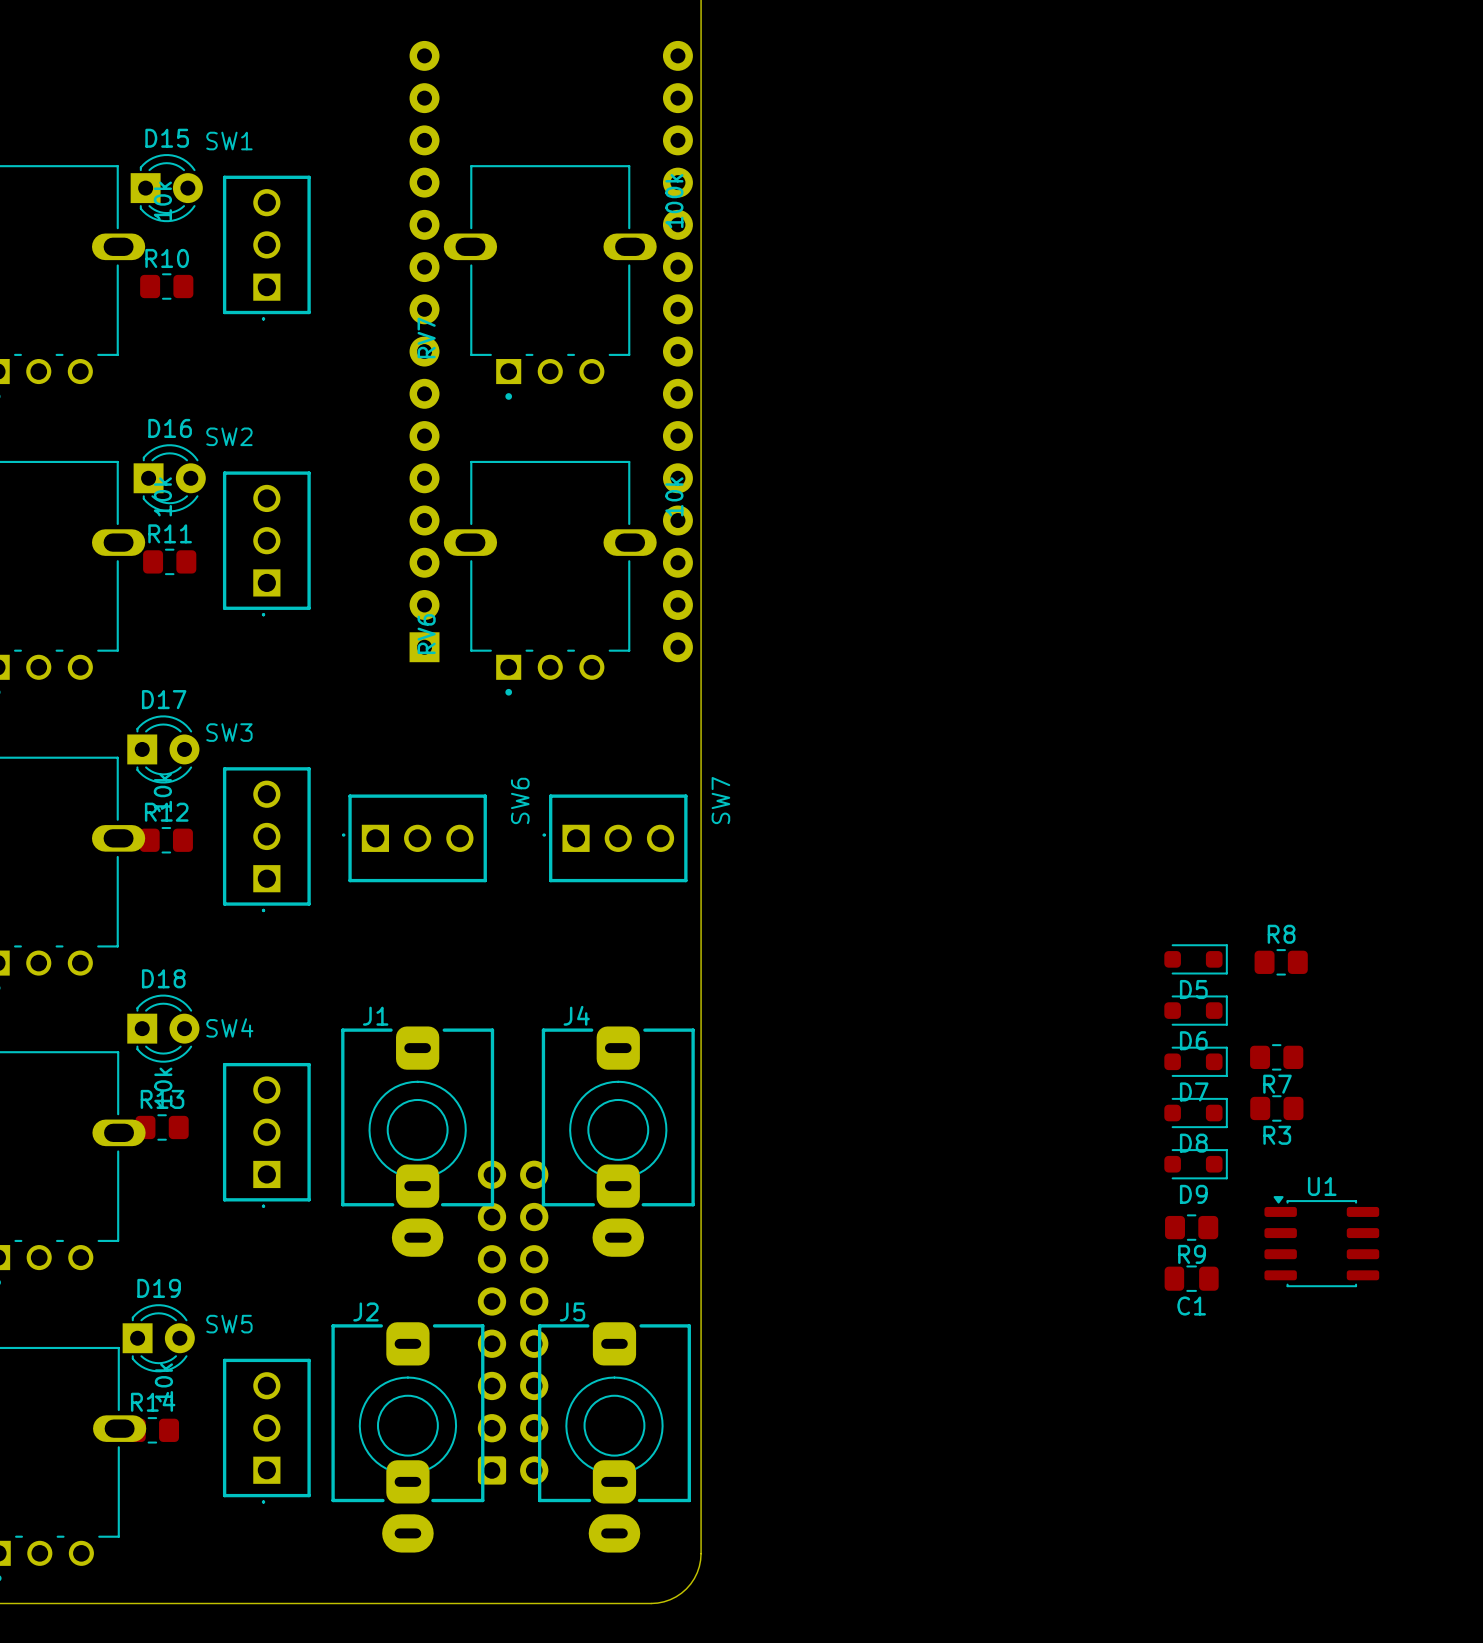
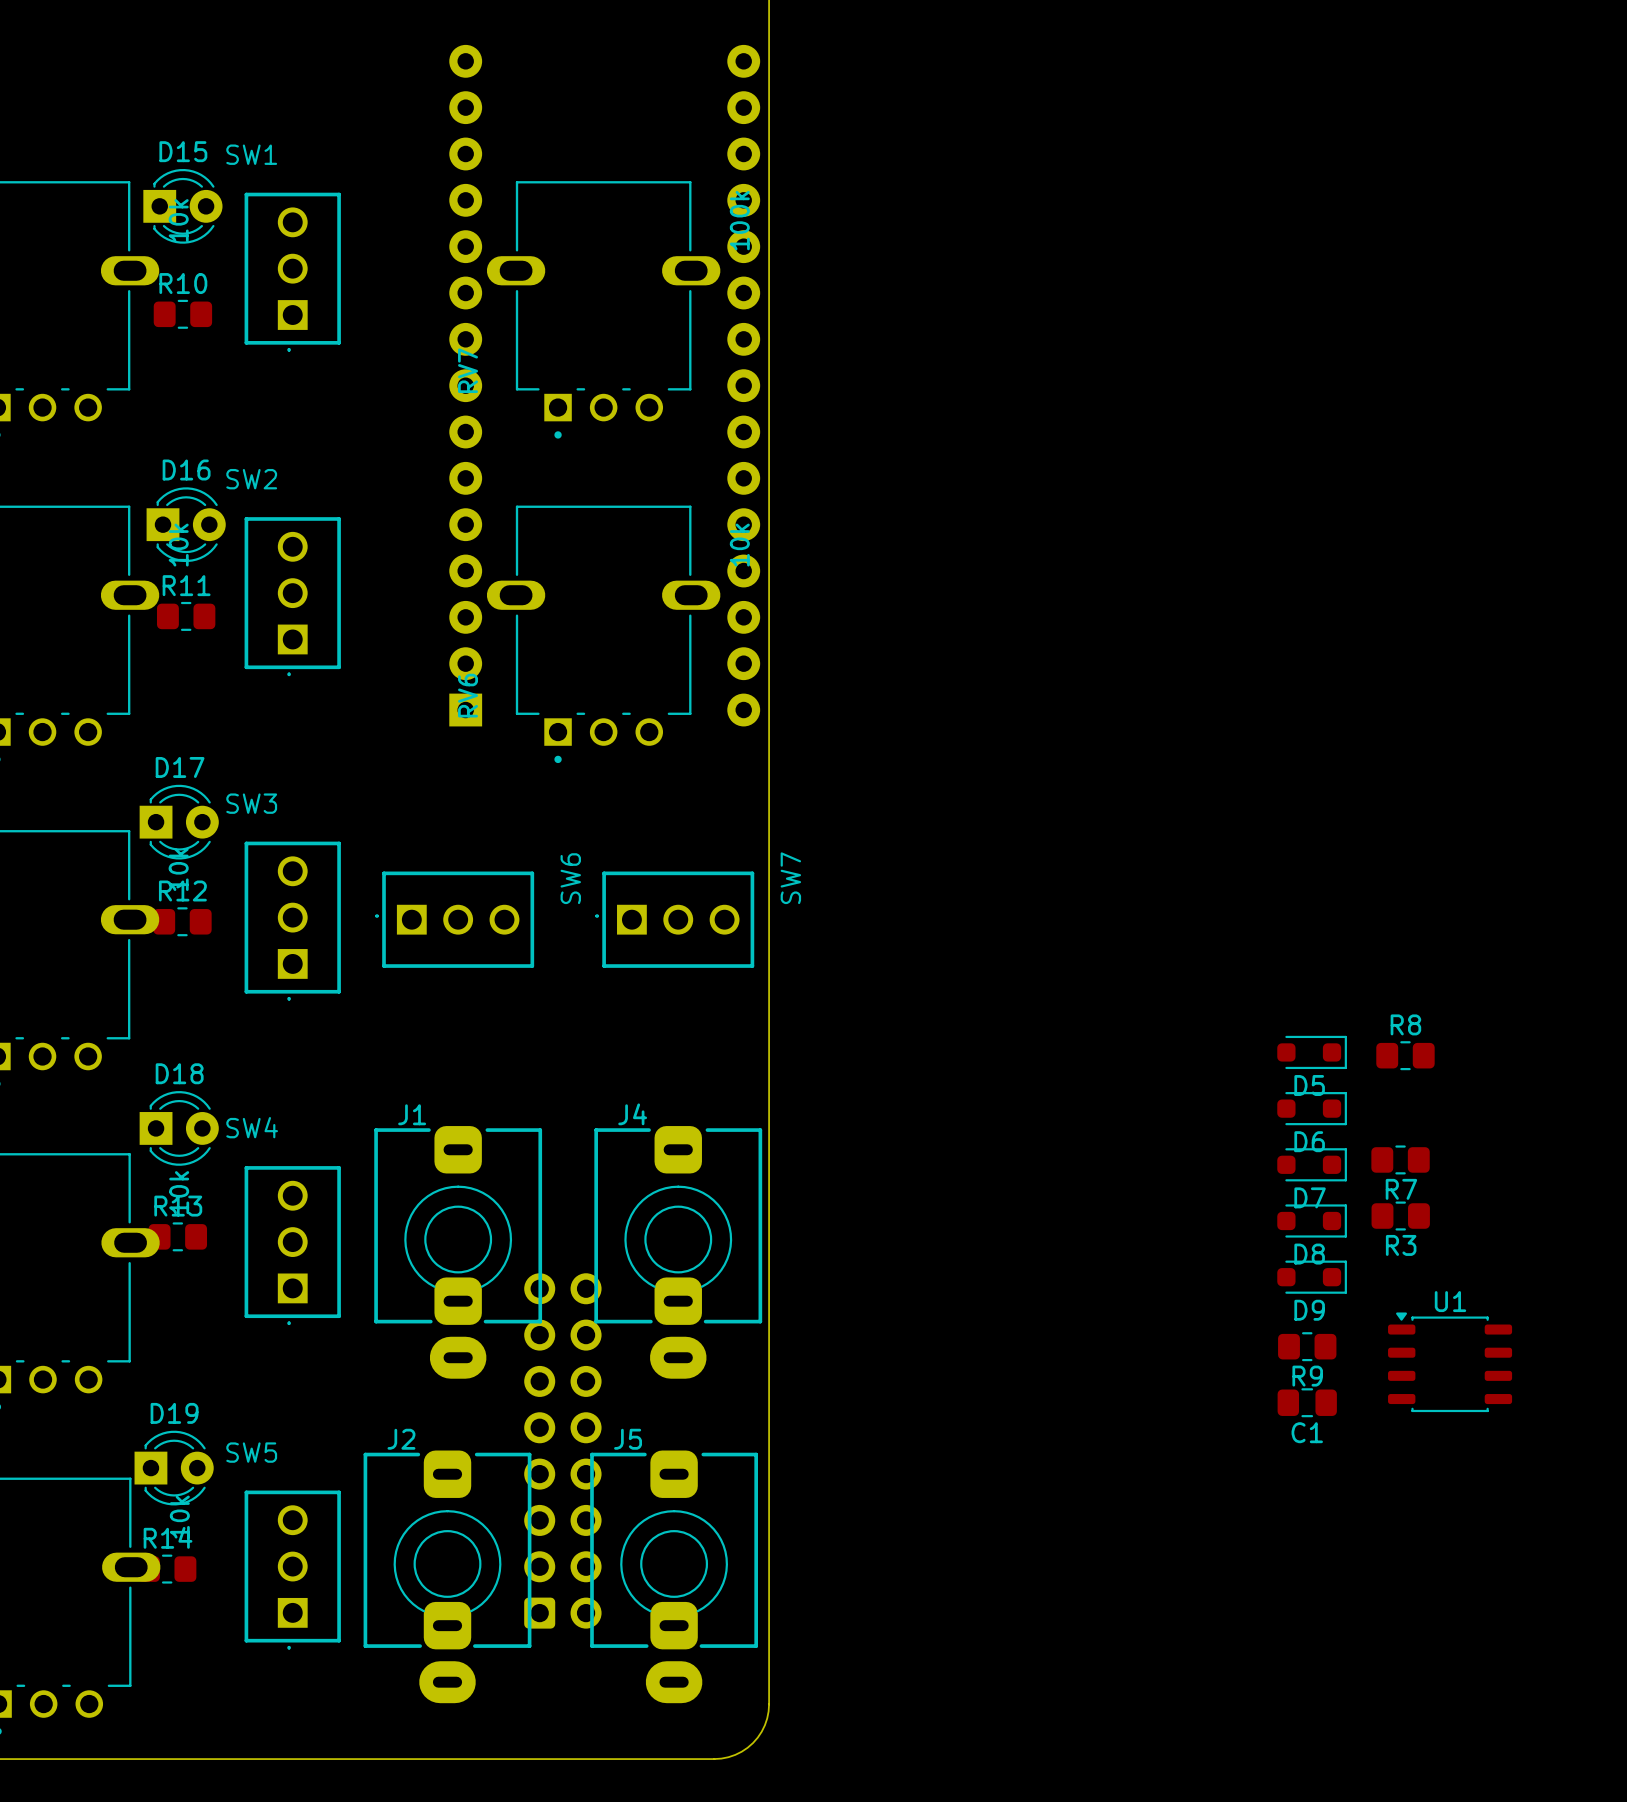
U1 footprint: [1264, 1196, 1380, 1288] -> [1388, 1312, 1513, 1413]

